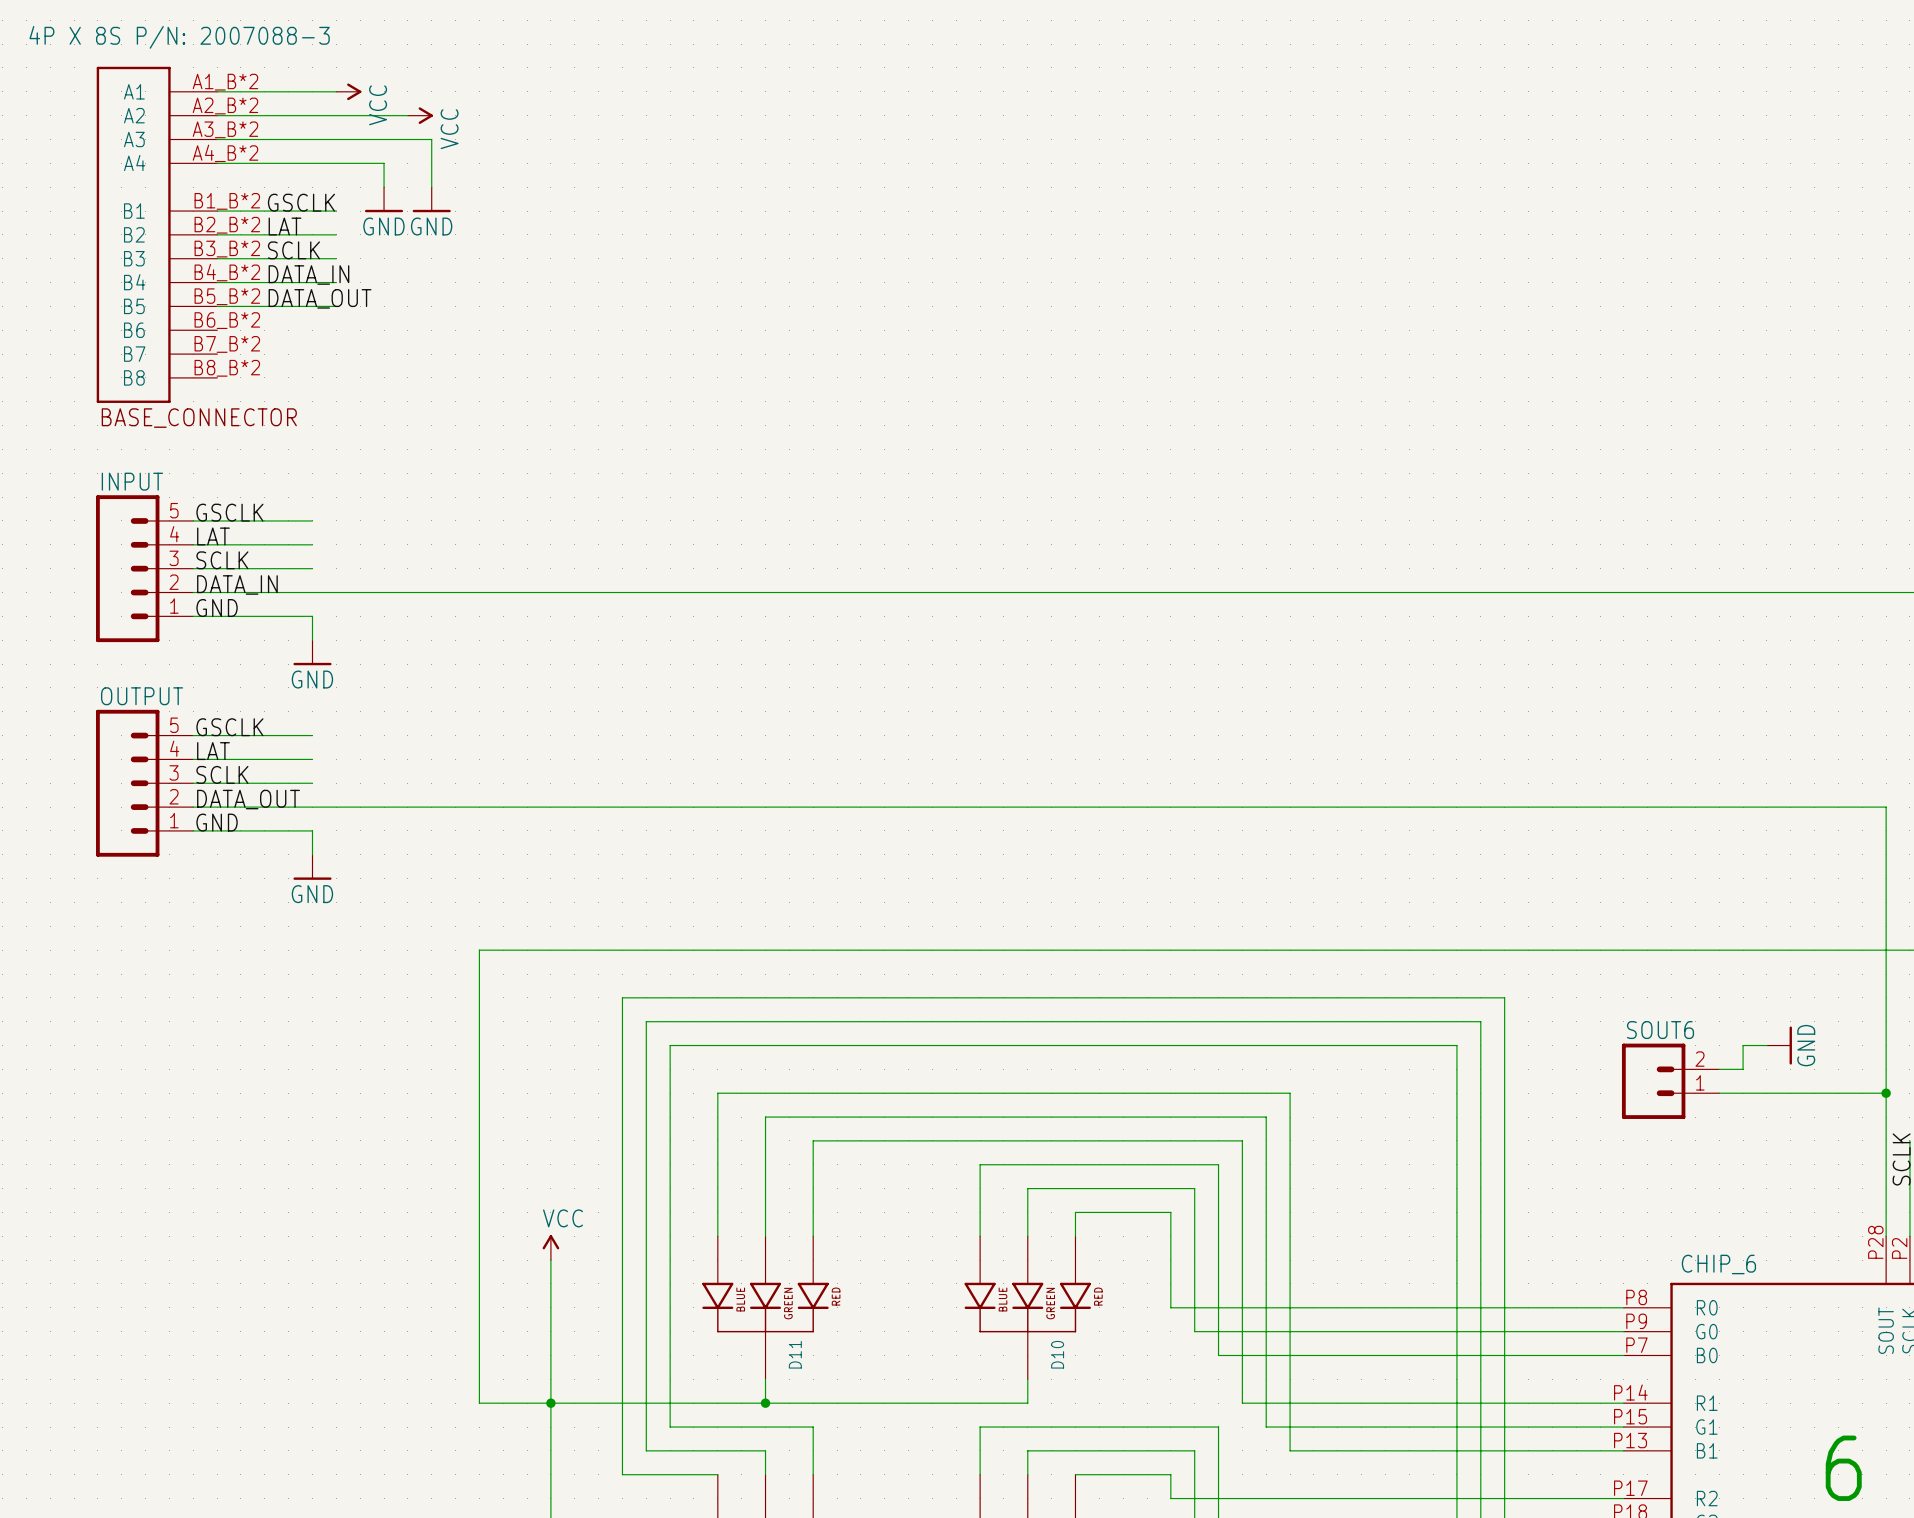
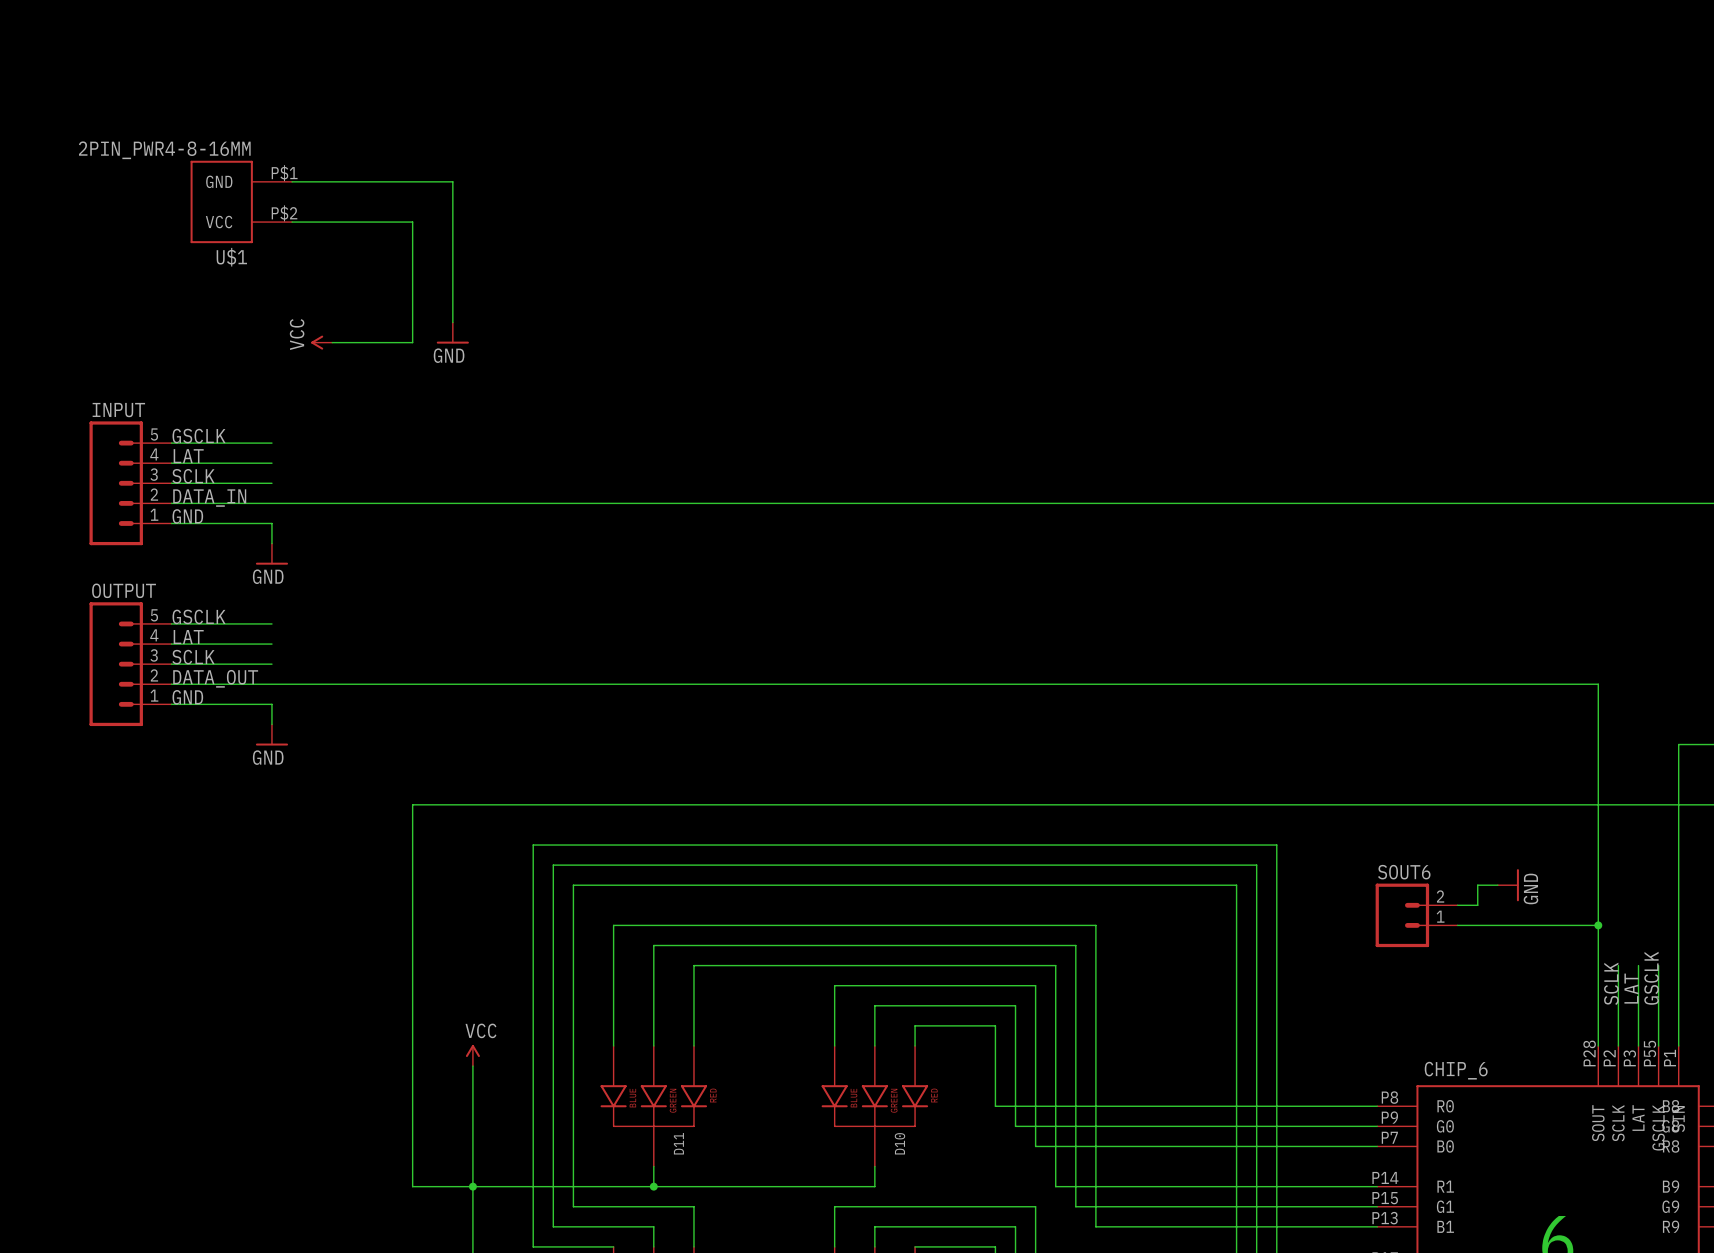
wire: (217, 91) (336, 91) -> none
power symbol: VCC (348, 91) -> none
wire: (217, 115) (407, 115) -> none
power symbol: VCC (420, 115) -> none
wire: (217, 139) (431, 139) (431, 187) -> none
wire: (217, 163) (384, 163) (384, 187) -> none
power symbol: GND (384, 199) -> none
power symbol: GND (431, 199) -> none
label: GSCLK (301, 202) -> none
wire: (217, 211) (336, 211) -> (452, 322) (452, 181) (292, 181)
label: LAT (285, 226) -> none
BASE_CONNECTOR: (156, 234) -> none
wire: (217, 234) (336, 234) -> none
U$1: none -> 2PIN_PWR4-8-16MM (241, 201)
label: SCLK (293, 250) -> none
wire: (217, 258) (336, 258) -> (332, 342) (412, 342) (412, 222) (292, 222)
label: DATA_IN (308, 275) -> none
label: DATA_OUT (320, 298) -> none
wire: (217, 306) (336, 306) -> none
power symbol: none -> GND (452, 333)
power symbol: none -> VCC (321, 342)

